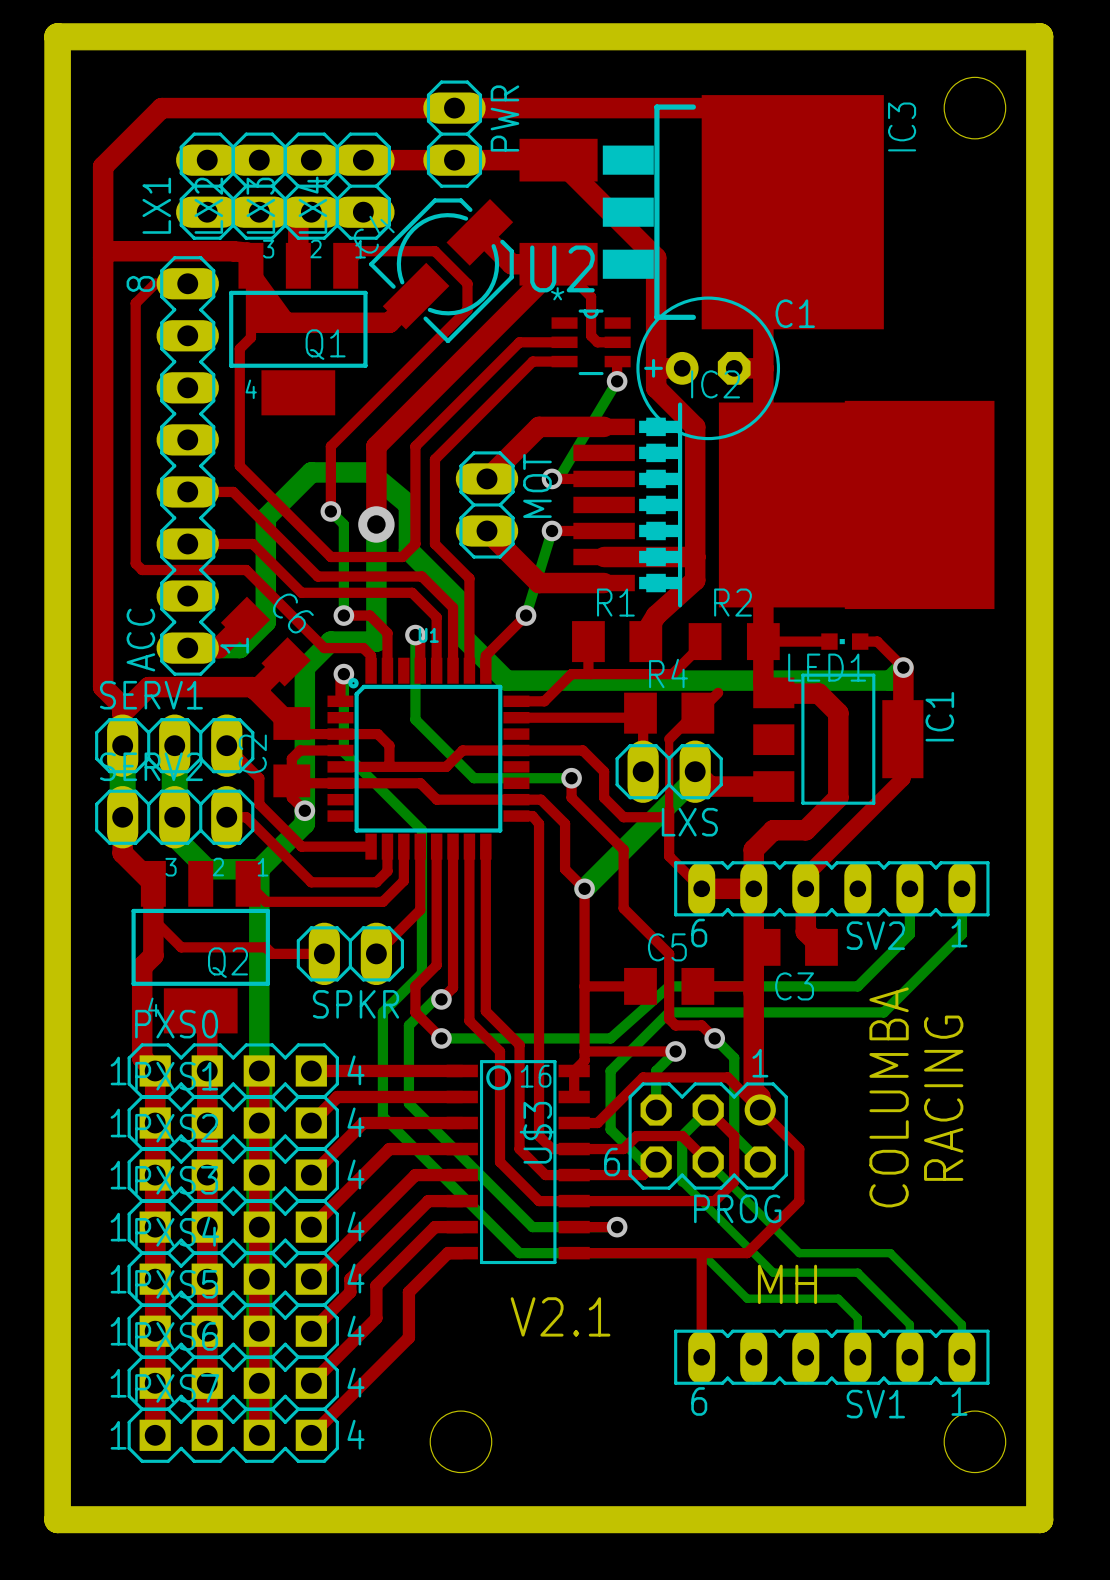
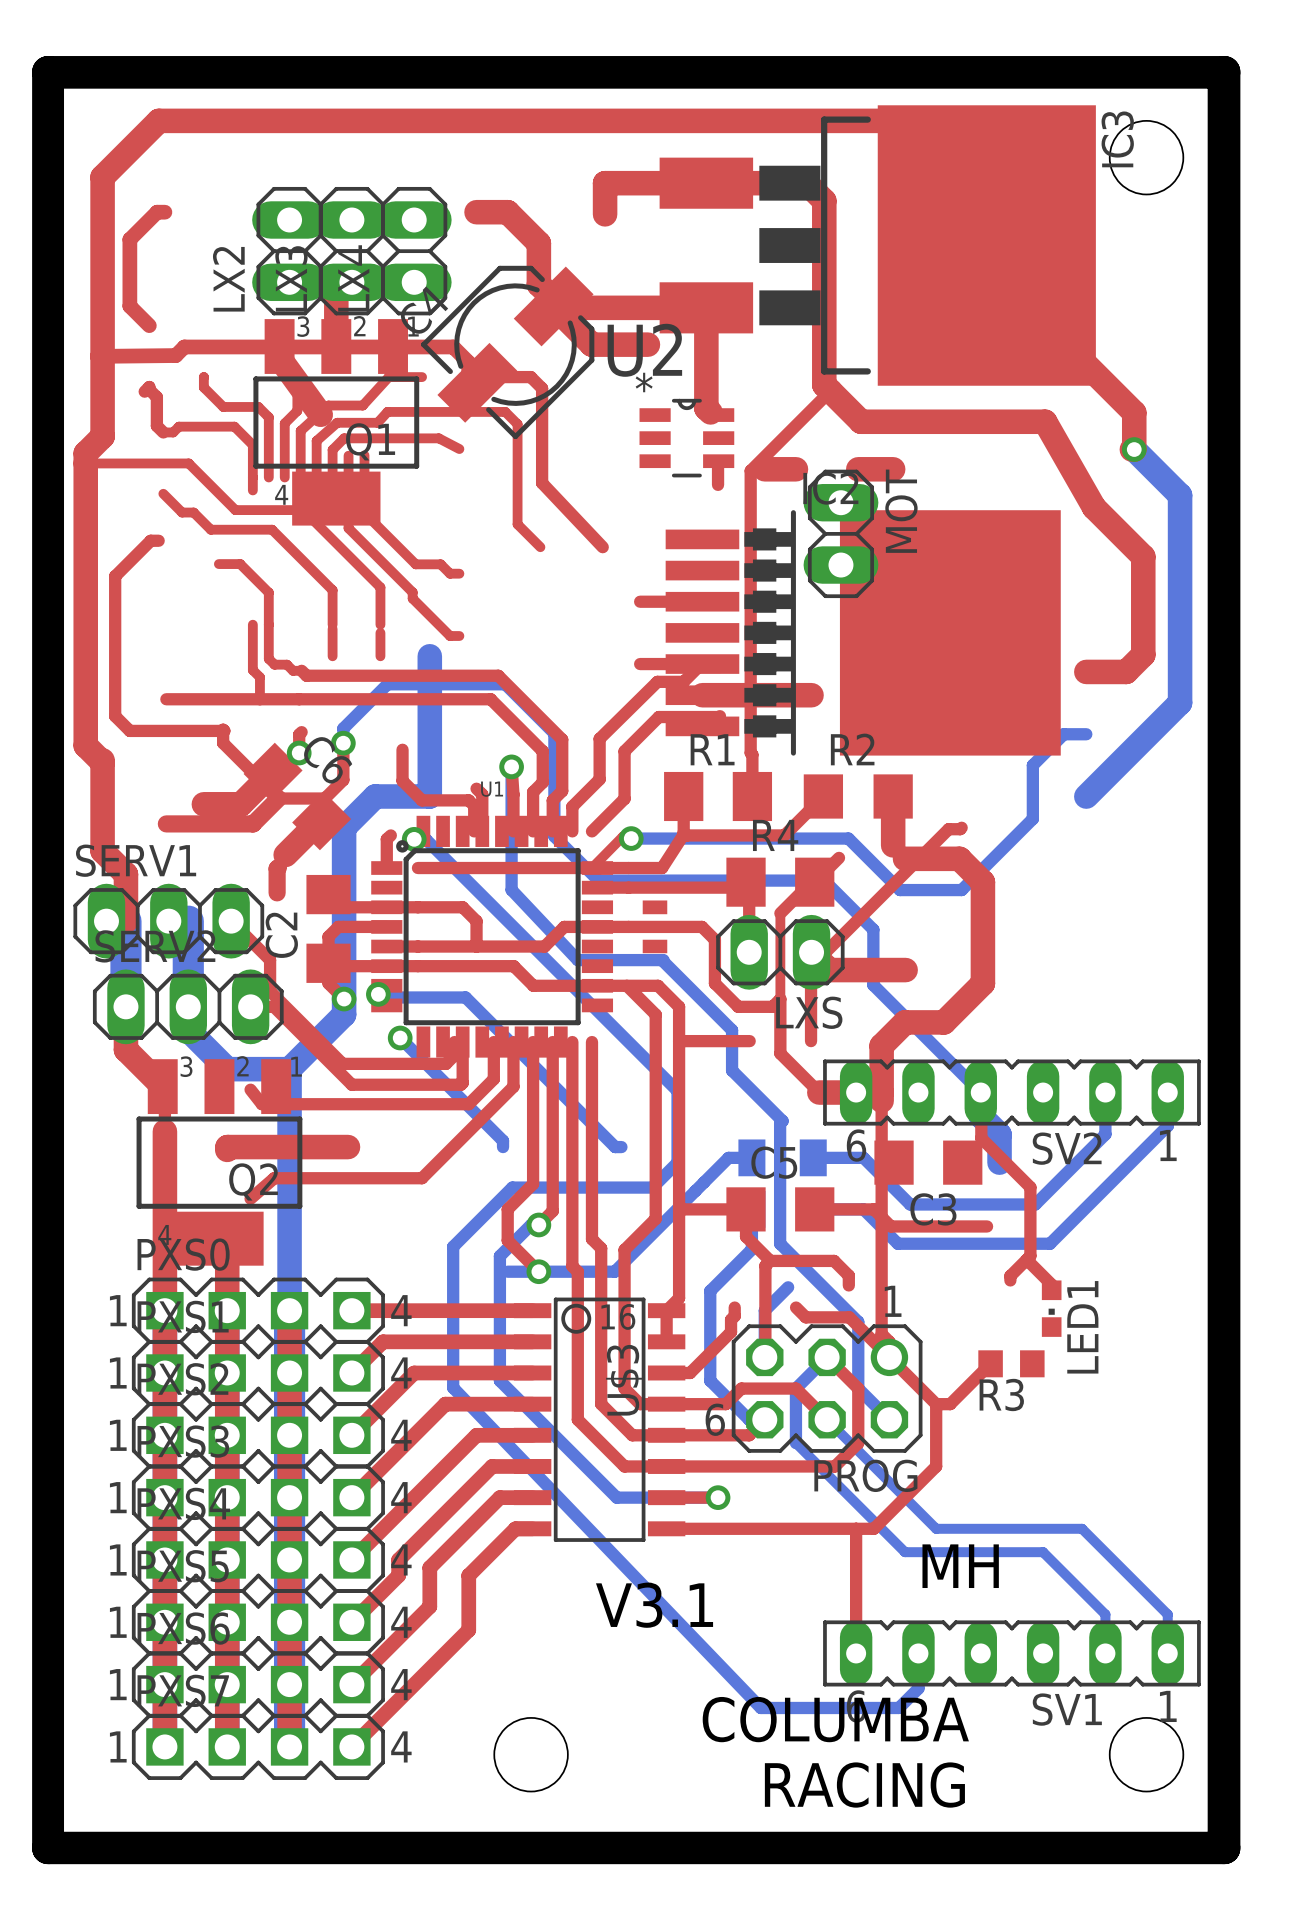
PWR: (454, 134) -> none
top track: none -> (164, 212) (157, 212) (129, 239) (129, 306) (149, 325)
top track: none -> (476, 212) (507, 212) (538, 243) (538, 284) (562, 307) (706, 307) (706, 408) (710, 412)
top track: none -> (605, 214) (605, 183) (806, 183) (824, 200) (824, 384) (861, 421) (1045, 421) (1094, 507) (1143, 556) (1143, 654) (1126, 671) (1086, 671)
top track: (207, 160) (558, 160) (656, 257) (656, 387) (695, 426) (695, 580) (656, 615) (645, 632) -> (830, 391) (750, 470) (750, 753) (752, 754) (752, 785)
top track: (103, 166) (161, 108) (708, 108) (773, 199) (773, 225) (792, 212) (763, 241) (763, 641) (829, 641) -> (102, 227) (102, 177) (158, 120) (908, 120) (986, 199) (986, 245) (983, 248) (983, 262) (1134, 412) (1134, 449) (1131, 449)
LX1: (207, 186) -> none
IC3 position: (701, 212) -> (877, 245)
top track: (103, 257) (109, 251) (247, 252) (250, 265) (250, 337) (239, 348) (239, 465) (330, 557) (402, 557) (415, 543) (415, 446) (519, 342) (564, 342) -> none
top track: (345, 265) (360, 251) (434, 251) (467, 283) (467, 309) (330, 446) (330, 511) -> none
top track: none -> (102, 356) (175, 355) (184, 346) (453, 346) (468, 362) (468, 377) (530, 377) (542, 388) (542, 483) (602, 547)
top track: (187, 283) (155, 283) (135, 303) (135, 563) (142, 570) (246, 570) (324, 648) (363, 648) (371, 655) (371, 670) -> none
top track: none -> (203, 377) (203, 387) (223, 406) (258, 406) (268, 417) (268, 477)
top track: none -> (297, 377) (297, 410) (284, 423) (284, 477)
top track: none -> (422, 377) (388, 377) (362, 405) (328, 405) (300, 430) (300, 477)
top track: (416, 296) (389, 322) (259, 322) (259, 309) -> none
top track: none -> (144, 391) (149, 387) (149, 389) (156, 397) (156, 425) (163, 432) (173, 432) (178, 426) (234, 426) (252, 445) (252, 490)
top track: (103, 340) (103, 611) -> (102, 436) (85, 453) (85, 745) (102, 762)
top track: (617, 342) (597, 342) (591, 335) (591, 296) (558, 264) (376, 446) (376, 524) -> none
top track: none -> (459, 449) (438, 438) (344, 438) (332, 449) (332, 477)
bottom track: none -> (1134, 449) (1180, 495) (1180, 702) (1086, 796)
via: none -> (1134, 449)
top track: none -> (364, 455) (364, 513) (415, 564) (440, 564) (450, 573) (459, 573)
top track: none -> (348, 455) (348, 528) (412, 592) (412, 598) (450, 636) (459, 636)
top track: (564, 361) (532, 361) (434, 459) (434, 543) (469, 578) (469, 670) -> none
top track: none -> (85, 463) (188, 463) (235, 510) (303, 510) (380, 587) (380, 624)
C1: (708, 368) -> none
top track: none -> (316, 477) (316, 440) (337, 422) (377, 422) (387, 411) (505, 411) (517, 424) (517, 524) (540, 547)
bottom track: (617, 381) (558, 478) (552, 478) -> none
via: (617, 381) -> none
top track: none -> (163, 493) (182, 512) (193, 512) (210, 529) (272, 529) (332, 590) (332, 624)
drawing: [844, 400, 995, 610] -> none
top track: (604, 426) (539, 426) (487, 478) -> none
top track: none -> (158, 540) (150, 540) (115, 576) (115, 716) (129, 730) (224, 730) (223, 729) (223, 743) (278, 798)
top track: none -> (218, 564) (240, 564) (268, 592) (268, 658) (274, 664) (286, 664) (293, 670) (301, 670) (306, 675) (498, 675) (562, 739) (562, 791) (552, 800) (552, 831)
ACC: (187, 465) -> none
via: (552, 478) -> none
top track: (187, 491) (233, 491) (317, 576) (421, 576) (453, 607) (453, 670) -> none
top track: none -> (252, 624) (252, 670) (259, 677) (259, 699)
top track: none -> (332, 629) (332, 656)
top track: none -> (380, 632) (380, 656)
MOT position: (487, 504) -> (840, 533)
bottom track: (330, 511) (343, 524) (343, 615) -> none
via: (330, 511) -> none
via: (376, 524) -> none
top track: (487, 530) (539, 583) (604, 583) -> none
bottom track: (552, 530) (526, 615) -> none
via: (552, 530) -> none
top track: none -> (720, 667) (698, 667) (683, 681) (657, 681) (599, 738) (599, 779) (572, 806) (572, 831)
top track: (187, 543) (252, 543) (301, 592) (412, 592) (436, 617) (436, 670) -> none
top track: none -> (166, 699) (490, 699) (542, 751) (542, 782) (533, 792) (533, 831)
top track: none -> (720, 716) (658, 717) (624, 751) (624, 798) (591, 831)
top track: none -> (301, 732) (299, 734) (299, 753)
bottom track: none -> (1086, 734) (1063, 734) (1032, 765) (1032, 818) (961, 890) (900, 890) (848, 838) (631, 838)
top track: none -> (343, 743) (343, 779) (324, 798) (278, 798)
bottom track: none -> (343, 743) (343, 728) (387, 684) (505, 684) (554, 733) (554, 836) (598, 880) (824, 880) (873, 929) (873, 985) (980, 1092) (980, 1115) (999, 1134) (999, 1162)
via: none -> (343, 743)
top track: none -> (402, 749) (402, 780) (422, 800) (468, 800) (474, 805) (474, 831)
via: none -> (299, 753)
top track: (343, 615) (369, 615) (387, 633) (387, 670) -> none
via: (343, 615) -> none
top track: (526, 615) (485, 655) (485, 670) -> none
via: (526, 615) -> none
top track: none -> (511, 766) (513, 831)
via: none -> (511, 766)
bottom track: (415, 635) (415, 719) -> (414, 839) (425, 839) (476, 889)
via: (415, 635) -> none
LED1 rotation: 0° (844, 641) -> 90° counterclockwise (1051, 1308)
LED1 position: (844, 641) -> (1051, 1308)
top track: (860, 641) (877, 641) (903, 667) (902, 778) (805, 875) (805, 931) (821, 947) -> none
top track: none -> (278, 798) (253, 823) (166, 823)
bottom track: (187, 648) (239, 648) (265, 622) (265, 517) (311, 472) (369, 472) (408, 504) (408, 550) (460, 602) (460, 635) (506, 680) (890, 680) (903, 667) -> none
top track: none -> (961, 827) (948, 829) (825, 952) (811, 952) (811, 1041)
via: (903, 667) -> none
bottom track: (343, 674) (343, 752) (421, 830) (421, 973) (382, 1012) (382, 1116) (519, 1253) (701, 1253) (747, 1298) (838, 1298) (857, 1318) (857, 1357) -> none
via position: (343, 674) -> (414, 839)
top track: (587, 674) (571, 674) (544, 701) -> (683, 835) (662, 868) (630, 868)
top track: none -> (631, 838) (629, 836) (623, 836) (591, 868) (417, 868)
via: none -> (631, 838)
top track: none -> (278, 867) (277, 892)
top track: (122, 713) (148, 687) (252, 687) (291, 726) -> none
drawing: none -> [642, 900, 668, 954]
top track: (377, 734) (389, 745) (389, 766) -> (431, 907) (462, 907) (476, 921) (476, 946)
IC1: (838, 739) -> none
SERV1 position: (174, 745) -> (168, 921)
top track: none -> (231, 921) (270, 960) (270, 991) (342, 1063) (446, 1063) (454, 1055) (454, 1042)
top track: (226, 745) (259, 778) (259, 804) (301, 846) (371, 846) -> none
top track: (488, 750) (462, 750) (446, 766) -> (564, 926) (544, 946) (513, 946)
top track: (582, 750) (604, 771) (604, 797) (623, 817) (634, 817) -> (677, 926) (702, 926) (714, 939) (714, 983) (738, 1006)
bottom track: (695, 771) (695, 778) (584, 888) -> none
bottom track: (473, 778) (500, 778) -> (511, 766) (511, 889) (577, 960)
bottom track: none -> (546, 960) (677, 1090) (677, 1162) (652, 1187) (512, 1187) (453, 1246) (453, 1387) (760, 1707) (898, 1707) (918, 1688) (918, 1653)
top track: (571, 778) (571, 797) (623, 849) (623, 908) (669, 953) (669, 1018) (675, 1025) (701, 1025) (714, 1038) -> none
via: (571, 778) -> none
top track: (420, 783) (436, 799) (462, 799) -> (482, 966) (513, 966) (533, 985)
bottom track: none -> (378, 994) (381, 997) (465, 997) (615, 1147) (621, 1147)
via: none -> (378, 994)
top track: (516, 816) (532, 816) (539, 823) (539, 1020) -> (655, 1069) (655, 1218) (624, 1249)
bottom track: none -> (400, 1038) (503, 1140) (503, 1147)
via: none -> (400, 1038)
top track: none -> (679, 1041) (749, 1041)
top track: (387, 846) (387, 871) (376, 882) -> (460, 1084) (429, 1084)
top track: (420, 846) (420, 910) -> (513, 1042) (513, 1086) (482, 1117)
top track: none -> (493, 1042) (493, 1079) (468, 1104) (261, 1104) (250, 1089)
top track: (436, 846) (436, 965) (415, 986) (415, 1012) (441, 1038) -> (533, 1042) (533, 1183) (507, 1209) (507, 1240) (538, 1271)
top track: (453, 846) (453, 987) (441, 999) -> (552, 1042) (552, 1211) (538, 1224)
top track: (469, 846) (469, 1020) (500, 1051) -> (572, 1042) (572, 1266) (577, 1271) (577, 1287)
top track: (485, 846) (485, 1011) (519, 1044) -> (591, 1042) (591, 1239) (601, 1248) (601, 1279)
top track: (565, 869) (584, 888) -> (626, 985) (658, 985) (679, 1006) (679, 1092)
top track: (402, 882) (382, 901) (266, 901) (248, 883) -> none
top track: (153, 883) (153, 955) (142, 966) (142, 1057) (155, 1070) -> (164, 1131) (164, 1310)
via: (584, 888) -> none
SV2 position: (831, 888) -> (1011, 1092)
top track: none -> (980, 1092) (981, 1138) (1030, 1187) (1030, 1256) (1010, 1276) (1010, 1280)
bottom track: (909, 888) (909, 934) (857, 986) (738, 986) -> (1167, 1092) (1167, 1125) (1050, 1243) (897, 1243) (863, 1209)
bottom track: none -> (1105, 1092) (1105, 1134) (1035, 1204) (910, 1204) (863, 1157) (813, 1157)
bottom track: (961, 888) (961, 934) (883, 1012) (669, 1012) (610, 1070) -> (751, 1209) (751, 1249) (710, 1291) (710, 1310)
top track width: thick (753, 895) (753, 1090) (760, 1097) (760, 1110) -> thin (881, 1100) (881, 1334) (889, 1341) (889, 1357)
top track: (155, 921) (181, 947) (265, 947) (272, 953) (324, 953) -> none
top track: none -> (347, 1147) (227, 1147) (227, 1149)
part: none -> (782, 1157)
SPKR: (350, 953) -> none
top track: none -> (429, 1170) (422, 1178) (274, 1178) (250, 1198)
top track: none -> (746, 1209) (746, 1236) (770, 1260)
bottom track: (696, 986) (669, 986) (610, 1038) (530, 1038) -> (751, 1157) (728, 1157) (614, 1271)
top track: none -> (881, 1217) (890, 1226) (987, 1226)
bottom track: (441, 999) (434, 999) (408, 1025) (408, 1103) (434, 1129) -> (538, 1224) (531, 1224) (499, 1256) (499, 1380)
via: (441, 999) -> none
via: none -> (538, 1224)
top track: none -> (1026, 1259) (1051, 1284) (1051, 1290)
top track: none -> (770, 1260) (834, 1260) (848, 1275) (848, 1285)
top track: none -> (770, 1260) (765, 1265) (764, 1357)
via: (441, 1038) -> none
via: none -> (538, 1271)
bottom track: (714, 1038) (734, 1057) (734, 1080) -> (661, 960) (732, 1030) (732, 1070) (782, 1121) (780, 1123) (780, 1243) (858, 1321)
via: (714, 1038) -> none
top track: (584, 1051) (675, 1051) -> none
via: (675, 1051) -> none
top track: none -> (796, 1307) (805, 1317) (850, 1318)
top track: (727, 1077) (643, 1077) (597, 1123) (593, 1123) -> (734, 1307) (734, 1316) (731, 1319) (731, 1332) (690, 1372)
text rotation: 0° (889, 1097) -> 90° clockwise (835, 1719)
text position: COLUMBA (889, 1097) -> COLUMBA (835, 1719)
text rotation: 0° (943, 1098) -> 90° clockwise (864, 1785)
text position: RACING (943, 1098) -> RACING (864, 1785)
top track: none -> (990, 1363) (950, 1404) (936, 1404)
R3: none -> (1011, 1363)
top track: (701, 1253) (701, 1357) -> (856, 1528) (856, 1653)
bottom track: (890, 1253) (961, 1324) (961, 1370) -> (1045, 1528) (1082, 1528) (1167, 1614) (1167, 1669)
bottom track: (857, 1272) (909, 1324) (909, 1357) -> (1006, 1552) (1043, 1552) (1105, 1614) (1105, 1653)
text position: MH (787, 1284) -> MH (960, 1566)
text: V2.1 (560, 1316) -> V3.1 (654, 1605)
SV1 position: (831, 1357) -> (1011, 1653)

